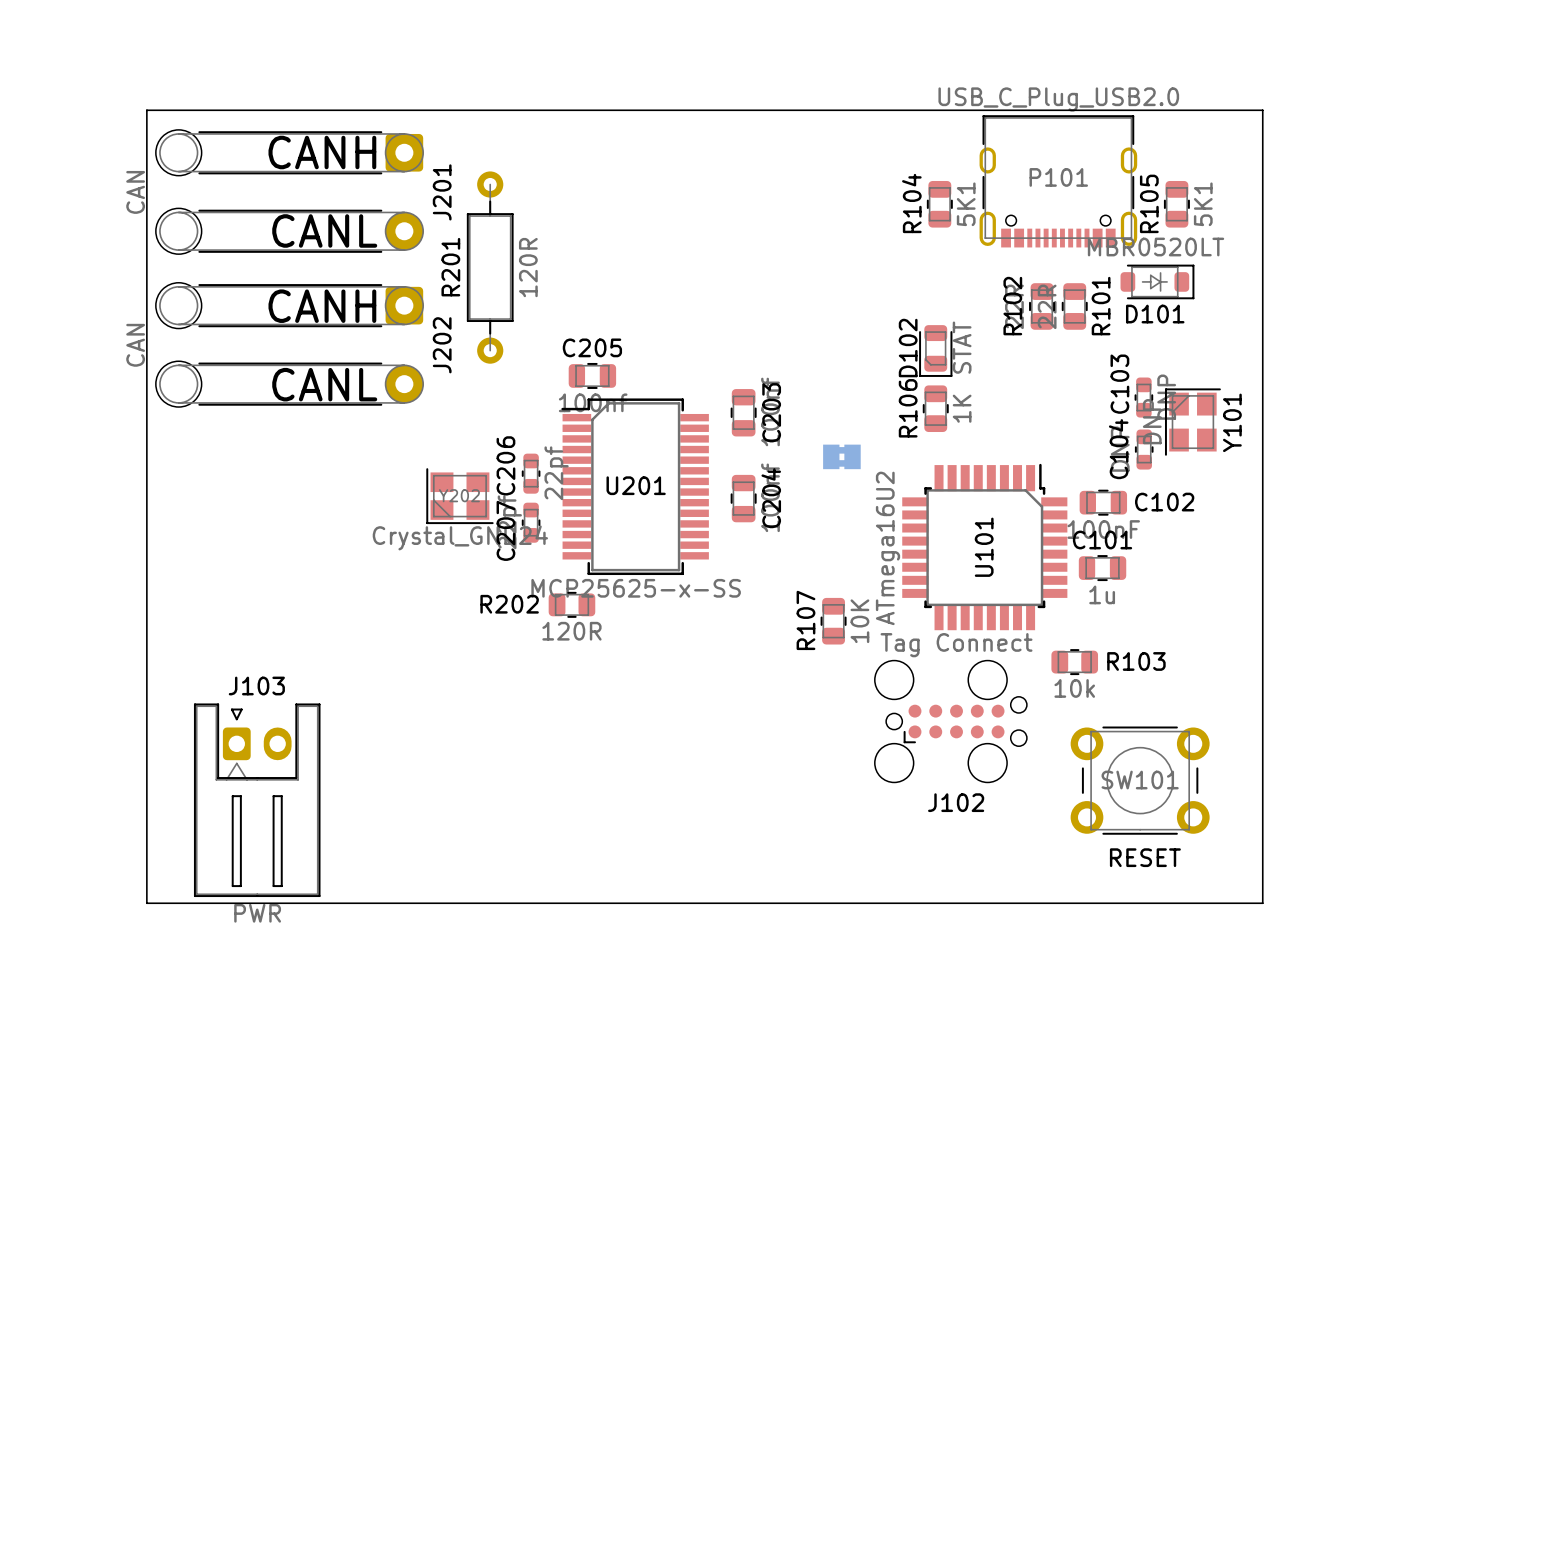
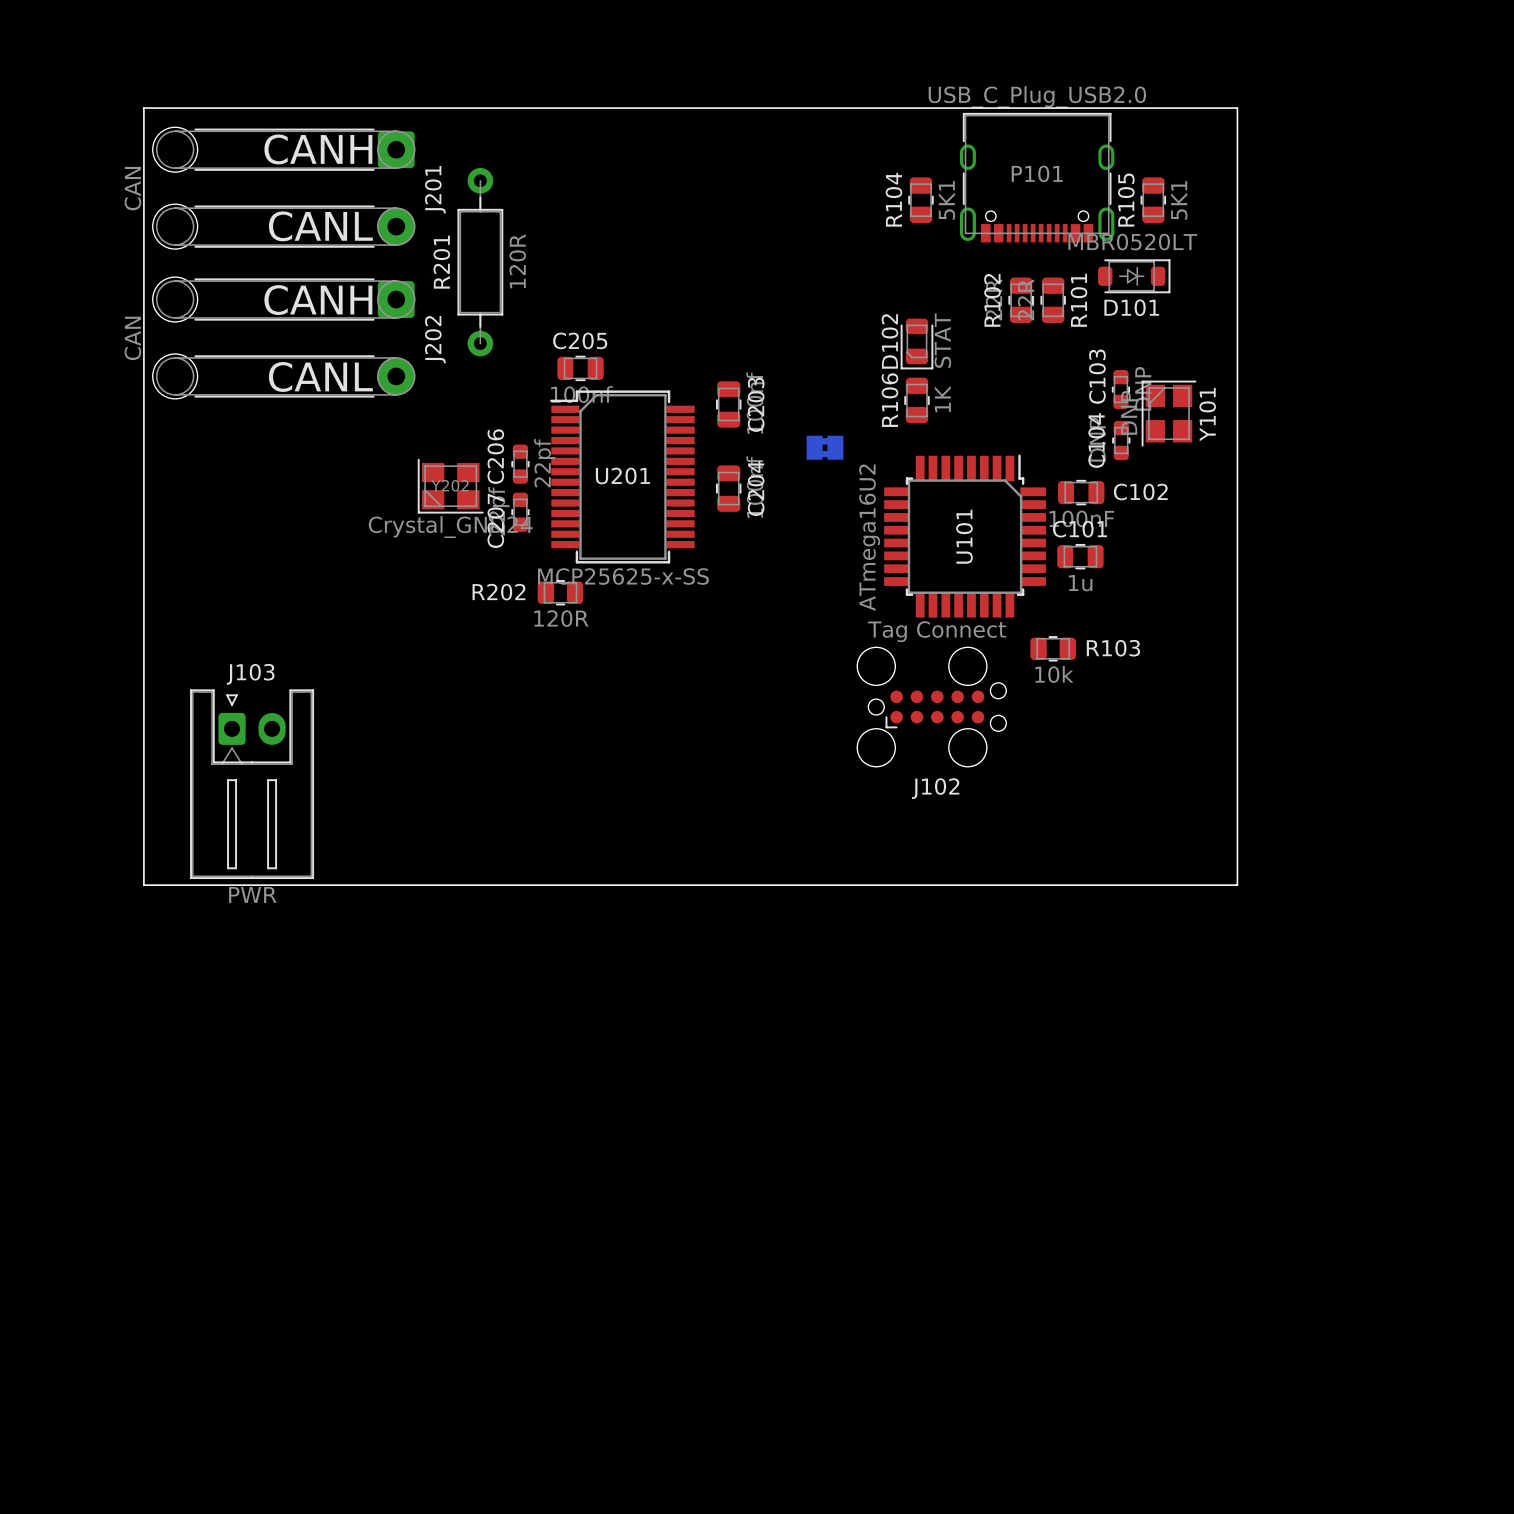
R107: 10K (833, 621) -> none
SW101: RESET (1140, 780) -> none

